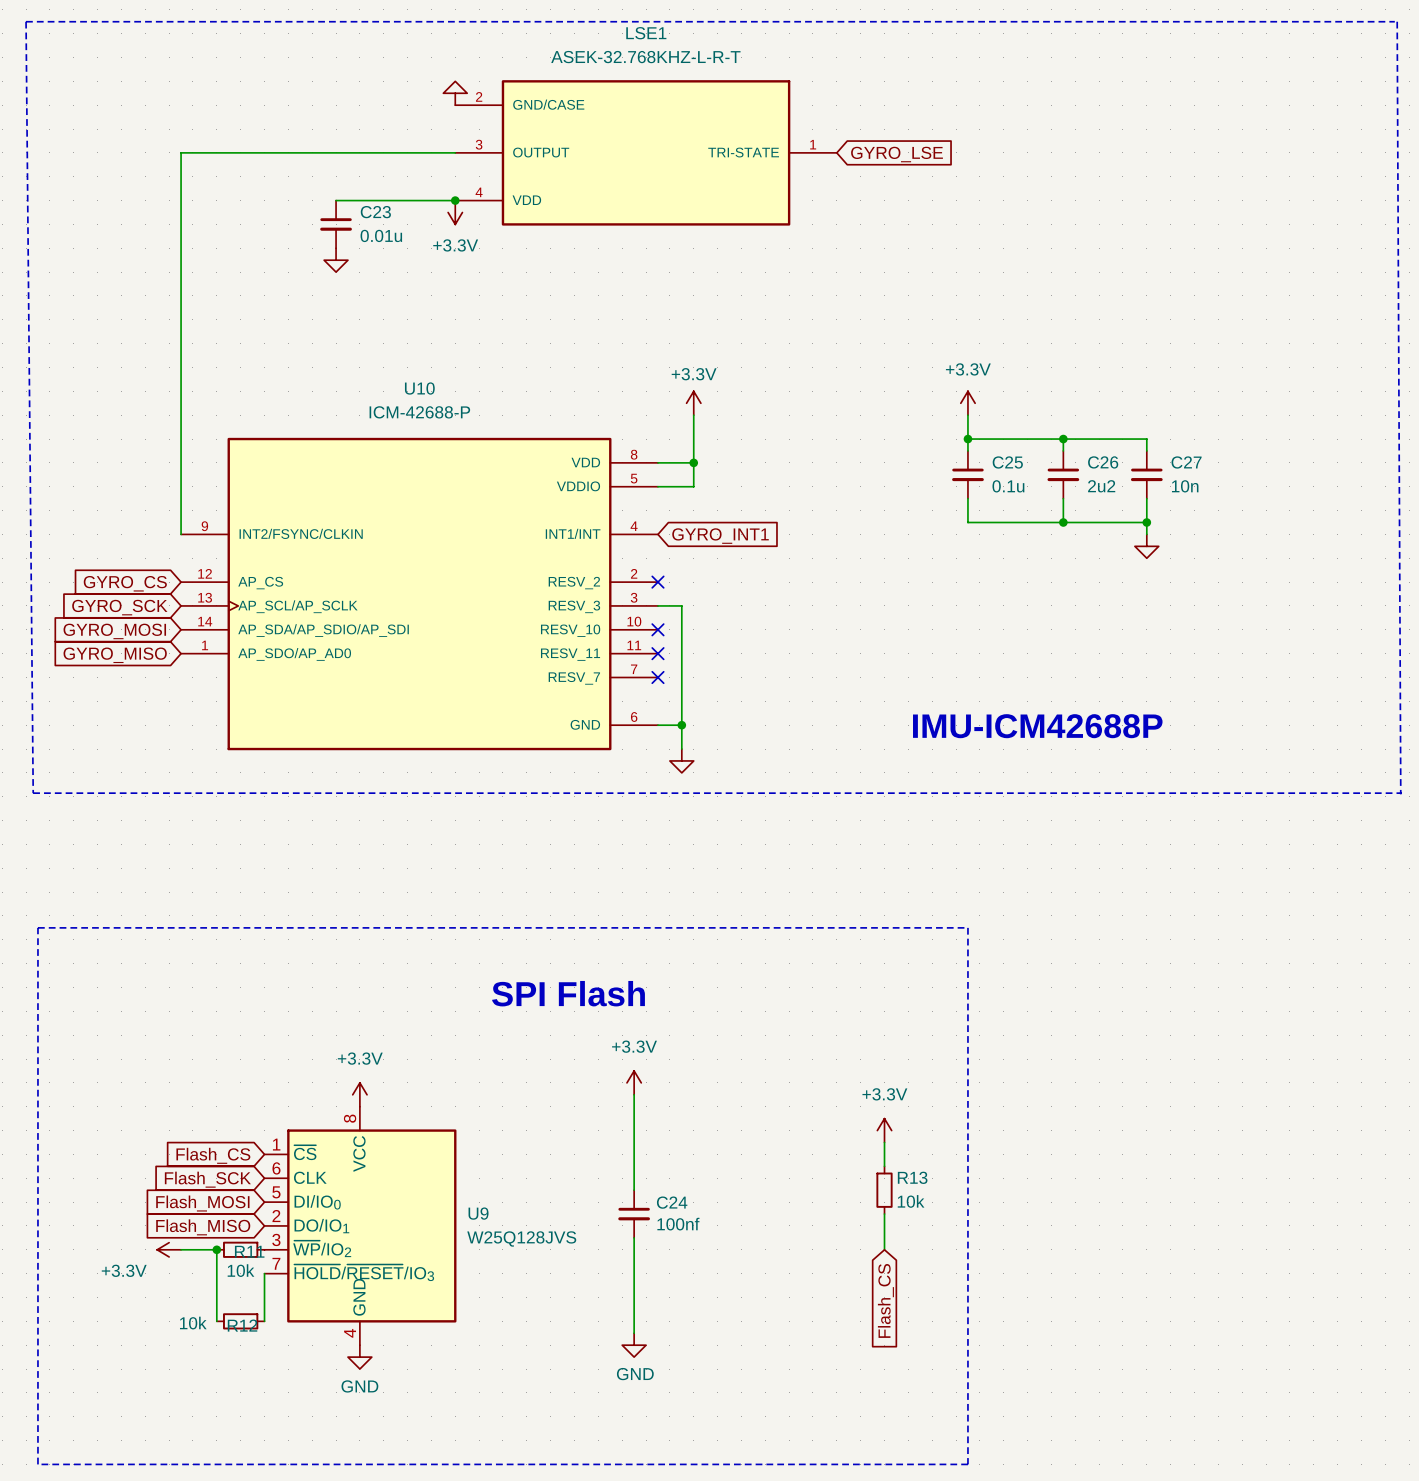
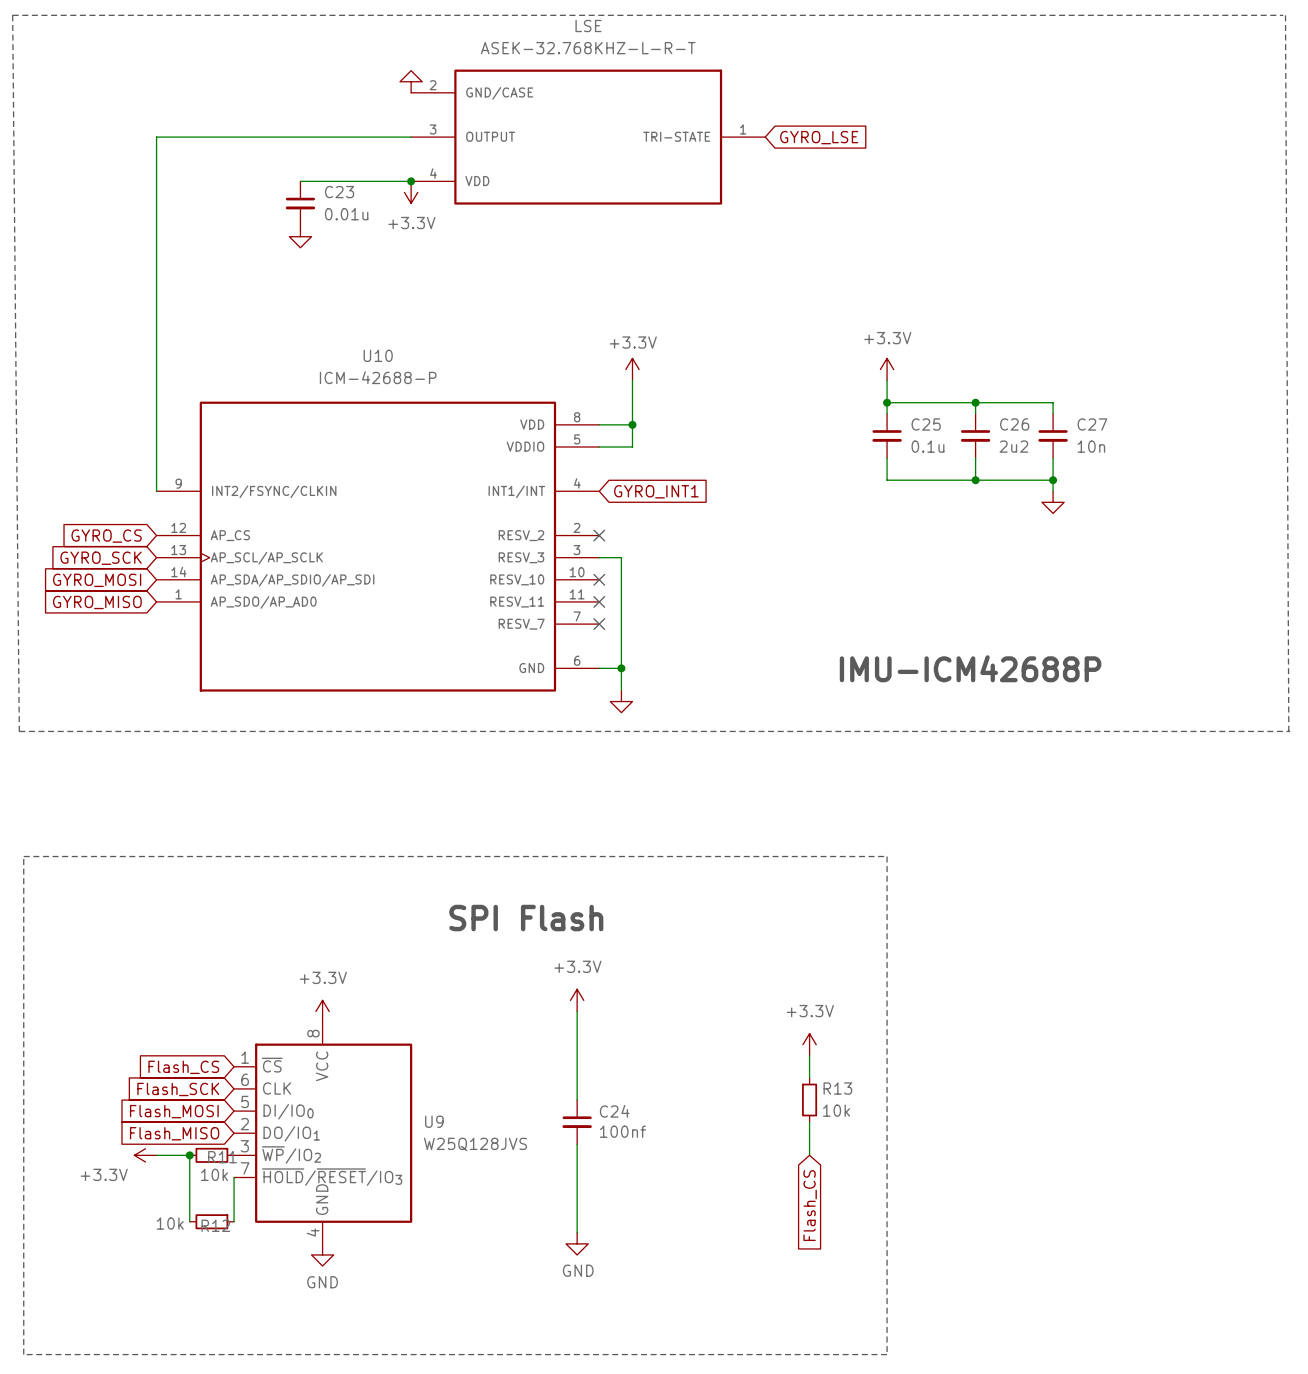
LSE1 name: LSE1 (646, 33) -> LSE (588, 25)

